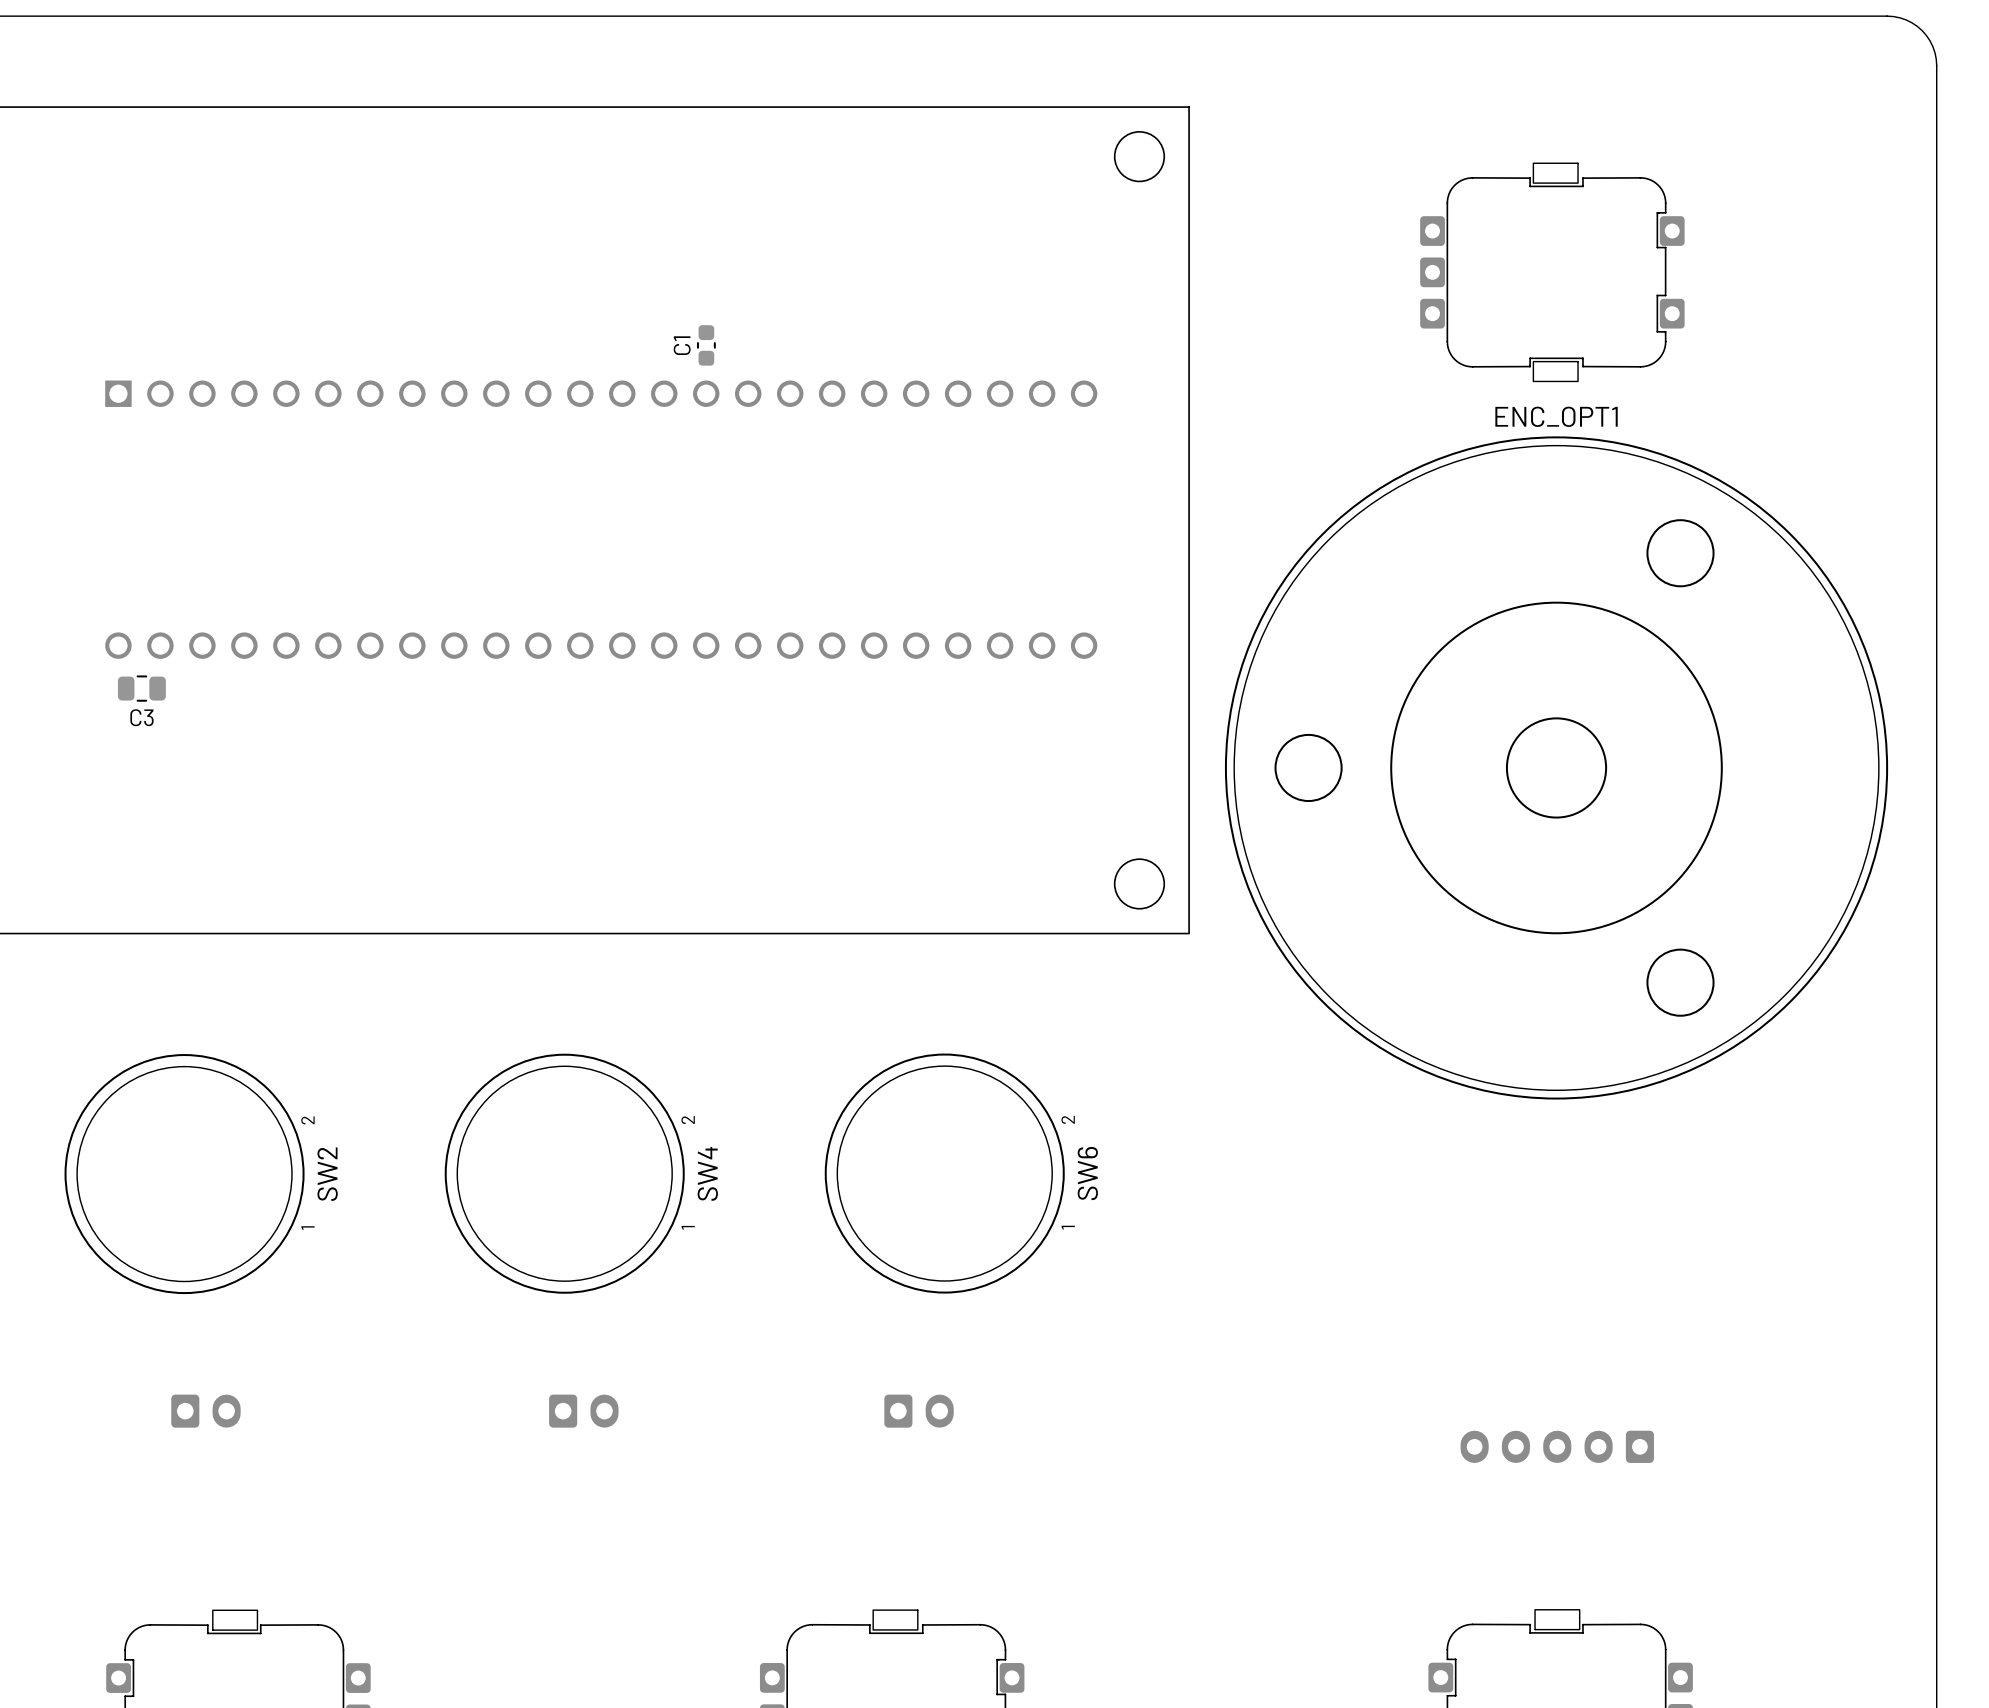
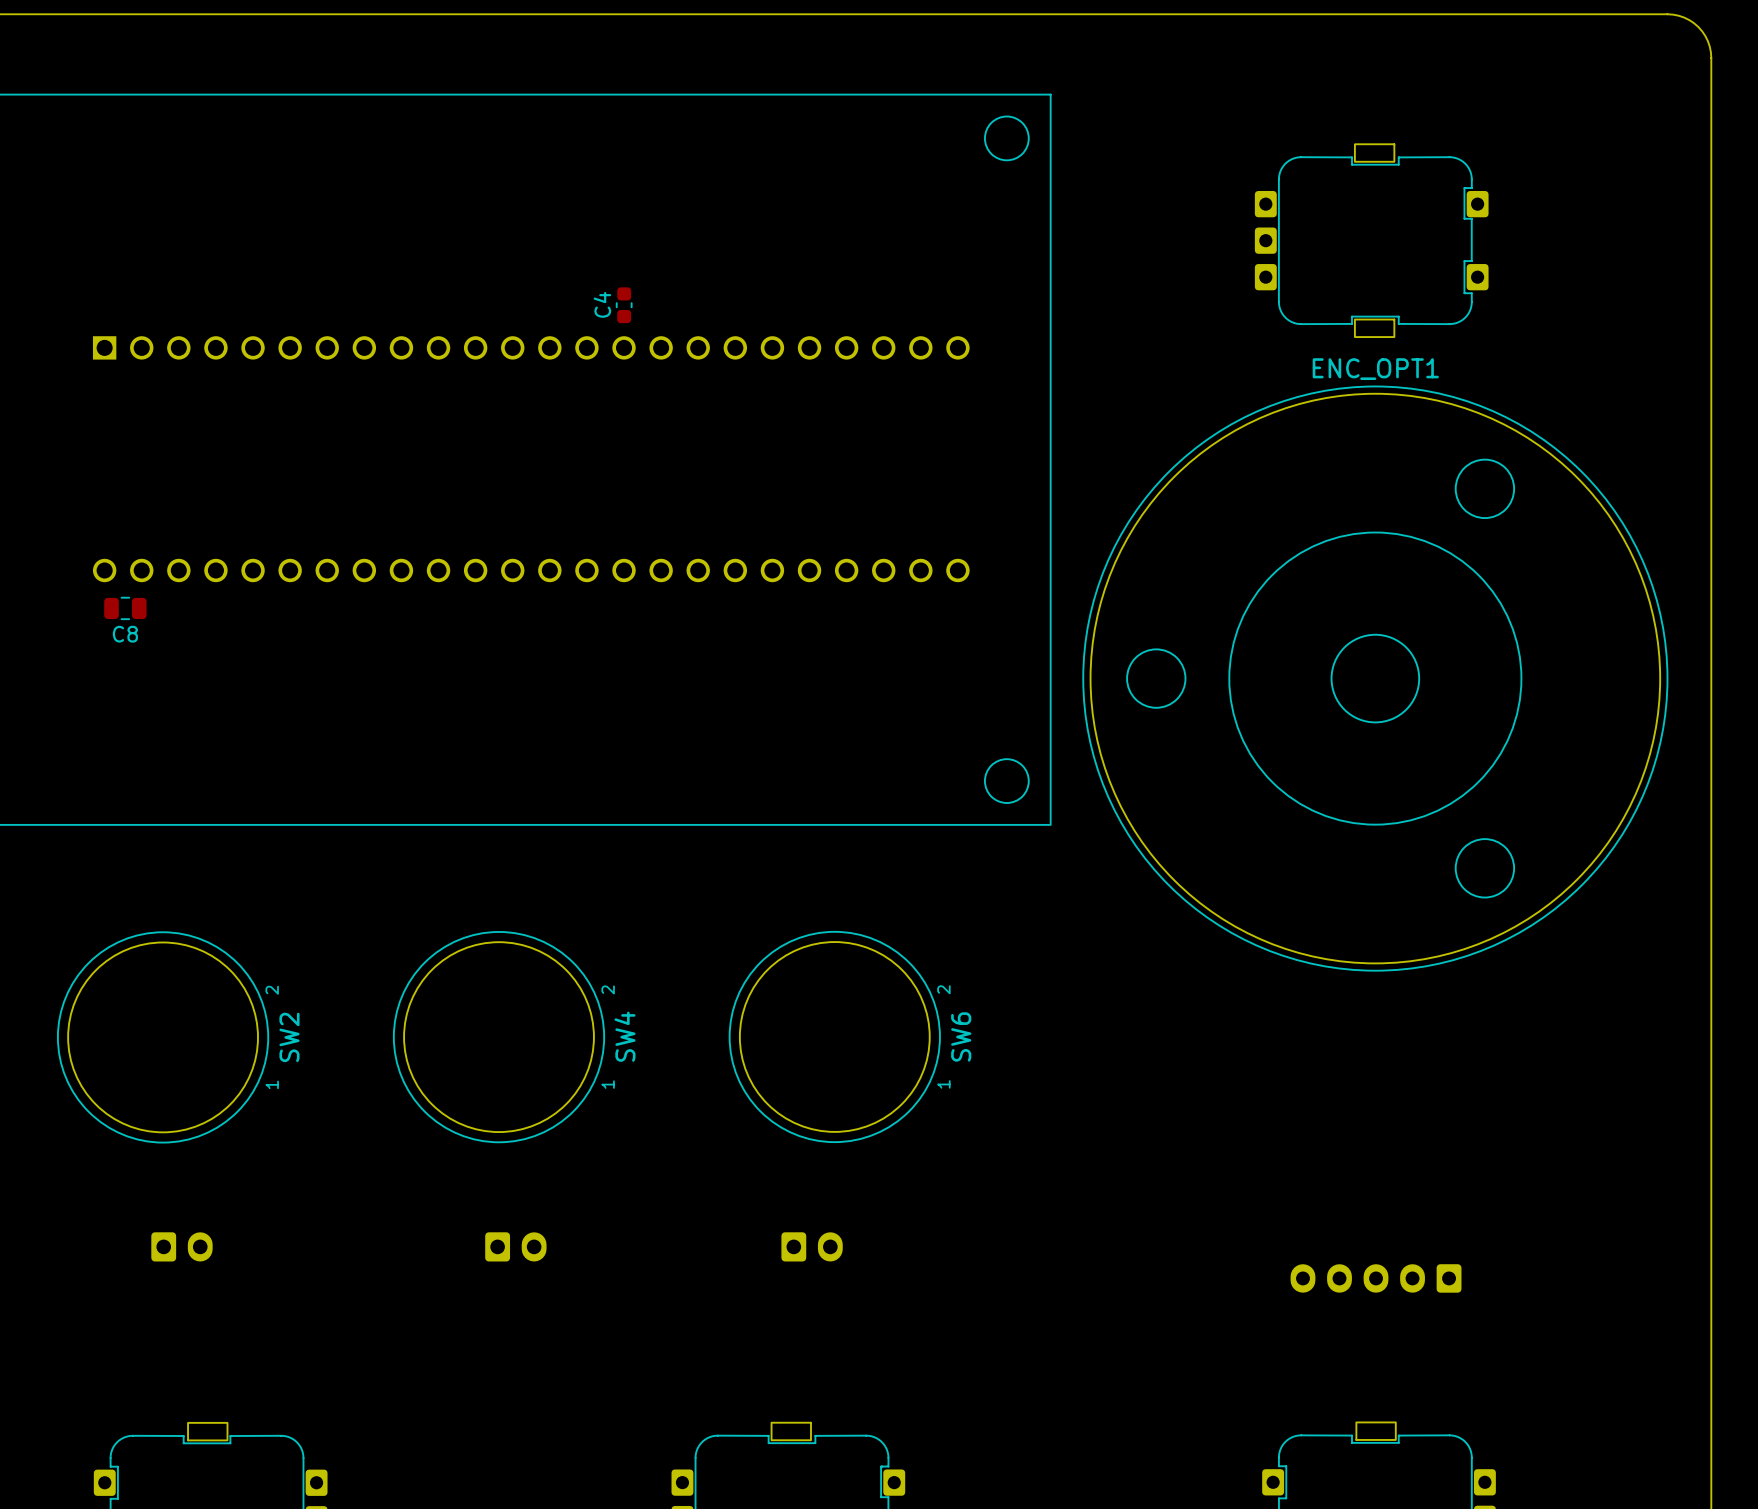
C1 name: C1 (682, 345) -> C4 (602, 304)
C3 name: C3 (141, 717) -> C8 (125, 634)

